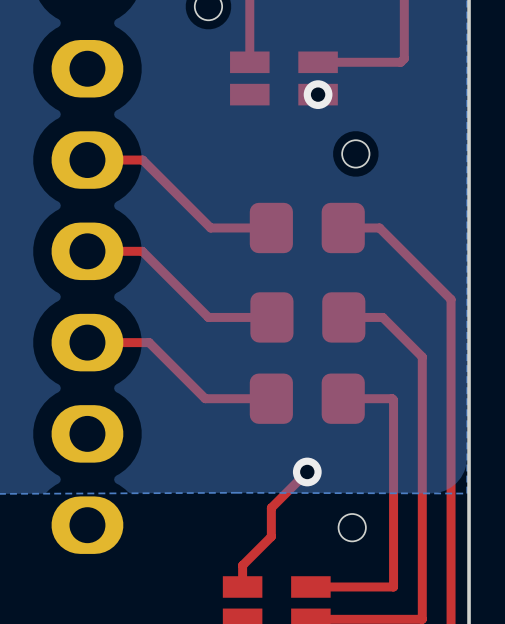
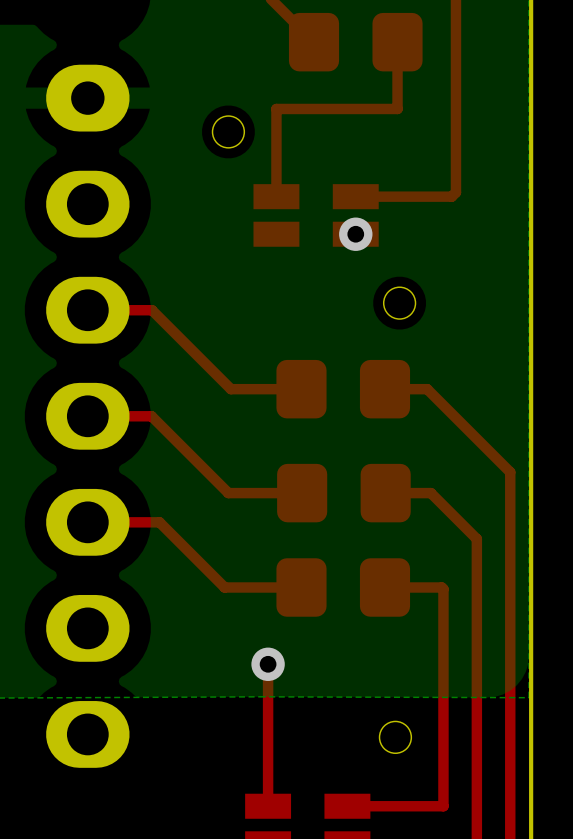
top track: (307, 471) (271, 507) (271, 536) (242, 565) -> (268, 664) (268, 781)
via position: (307, 471) -> (268, 664)

